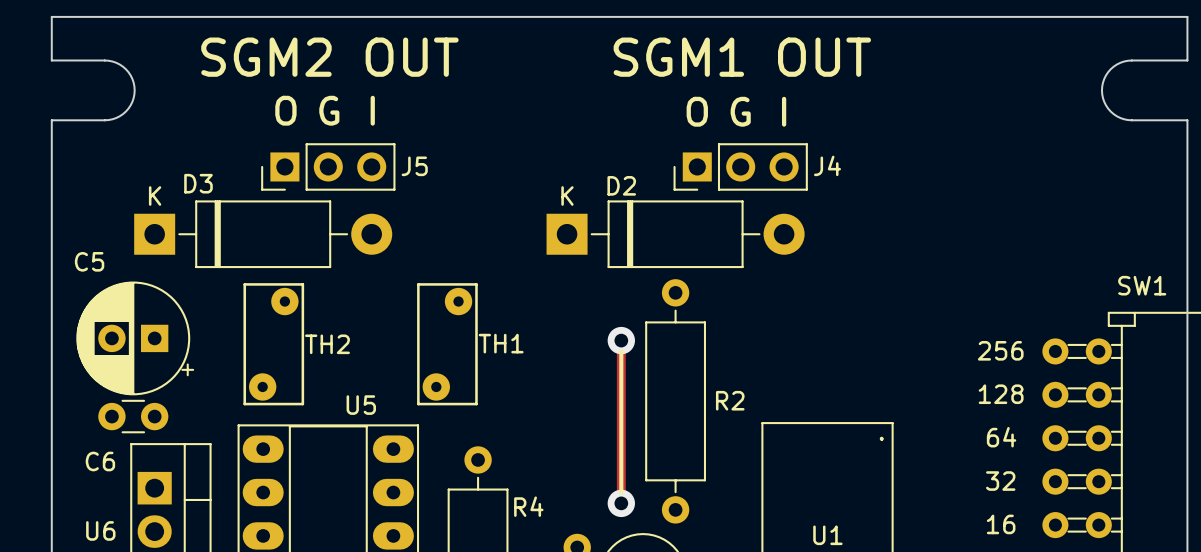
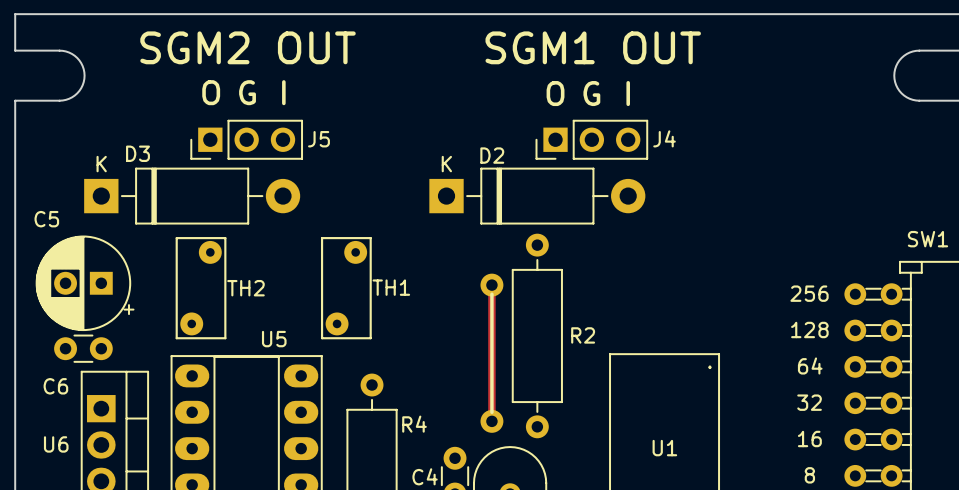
part: none -> (491, 285)
via: (621, 340) -> none
part: none -> (491, 421)
via: (621, 503) -> none

